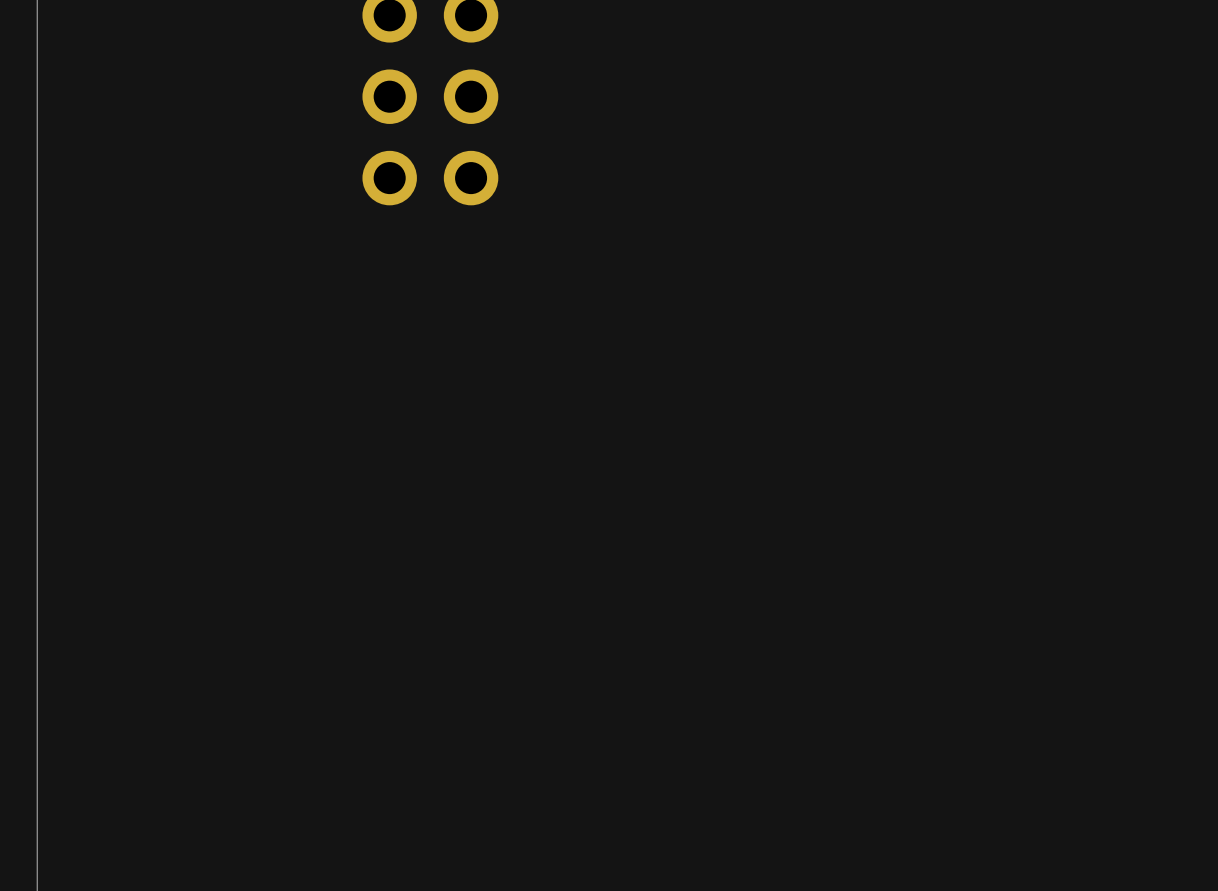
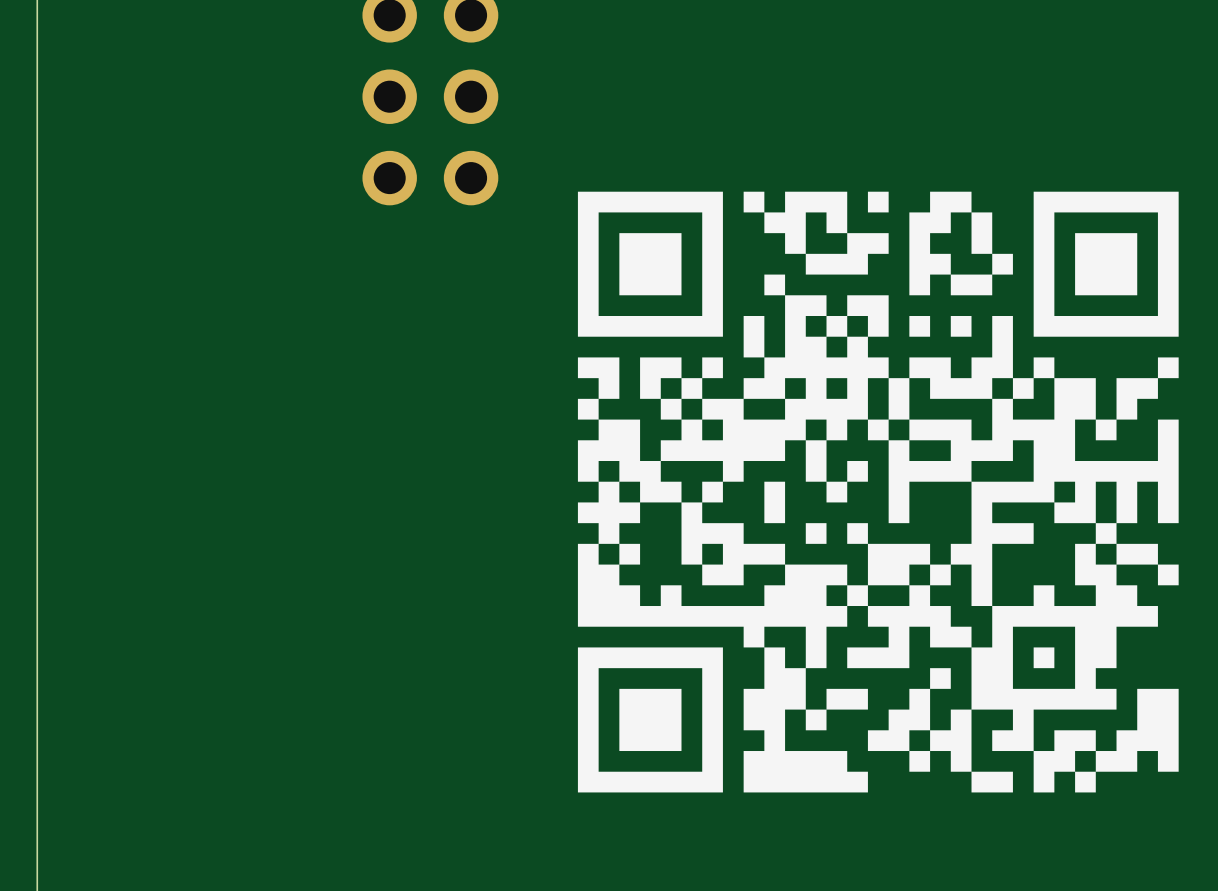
drawing: none -> [577, 191, 1179, 793]

